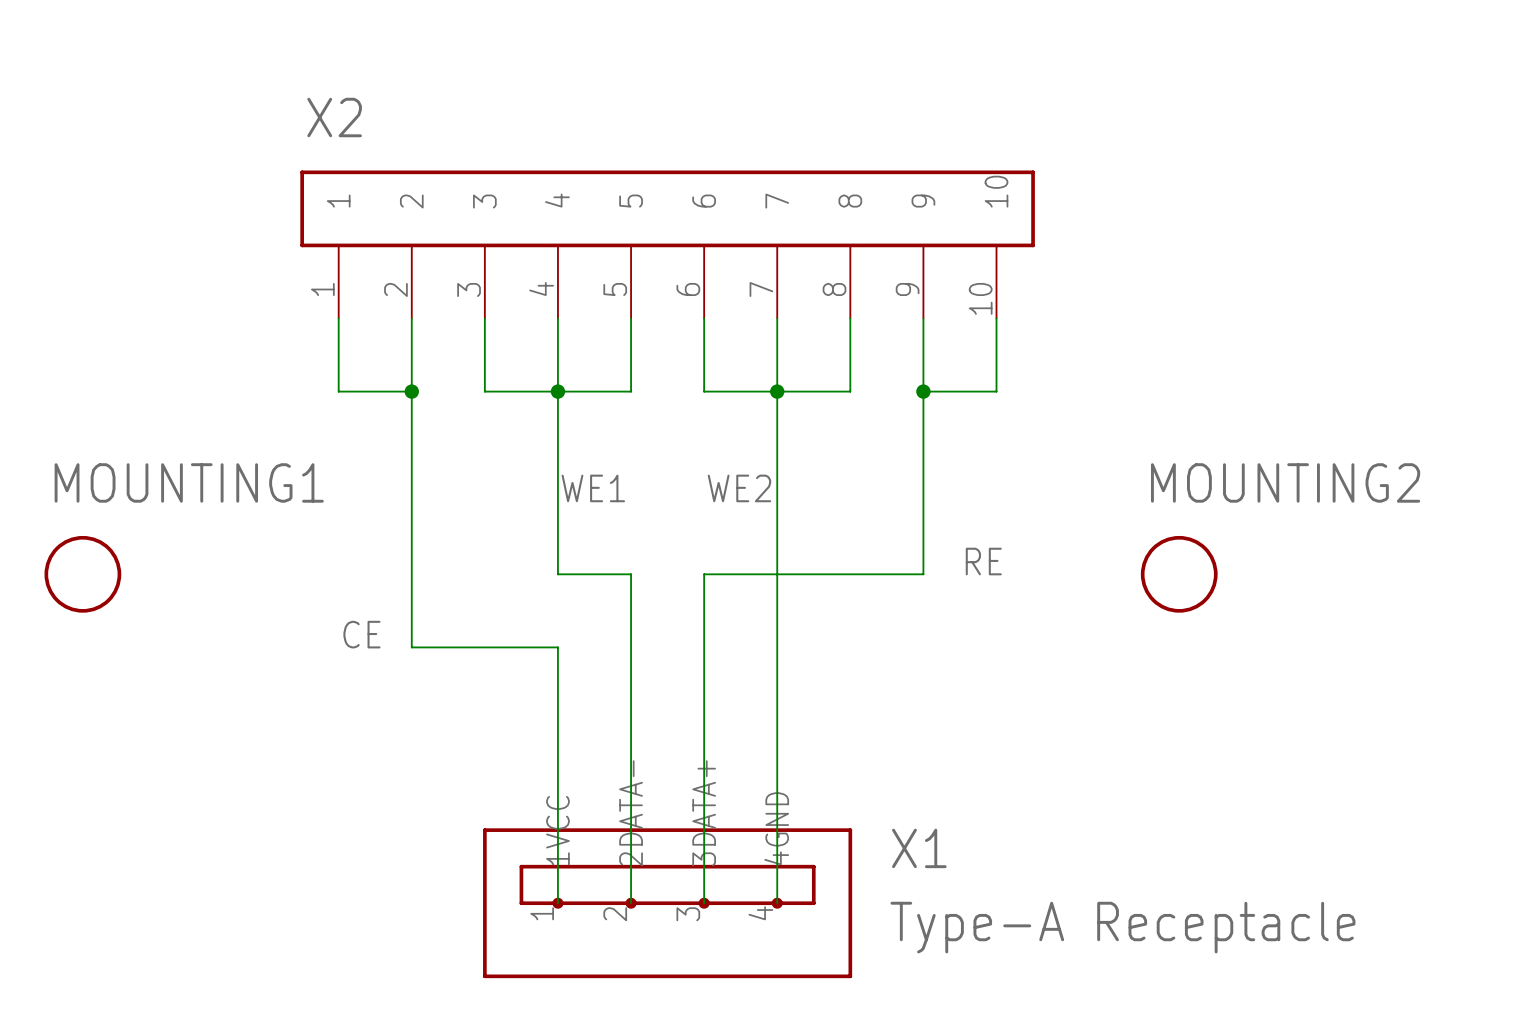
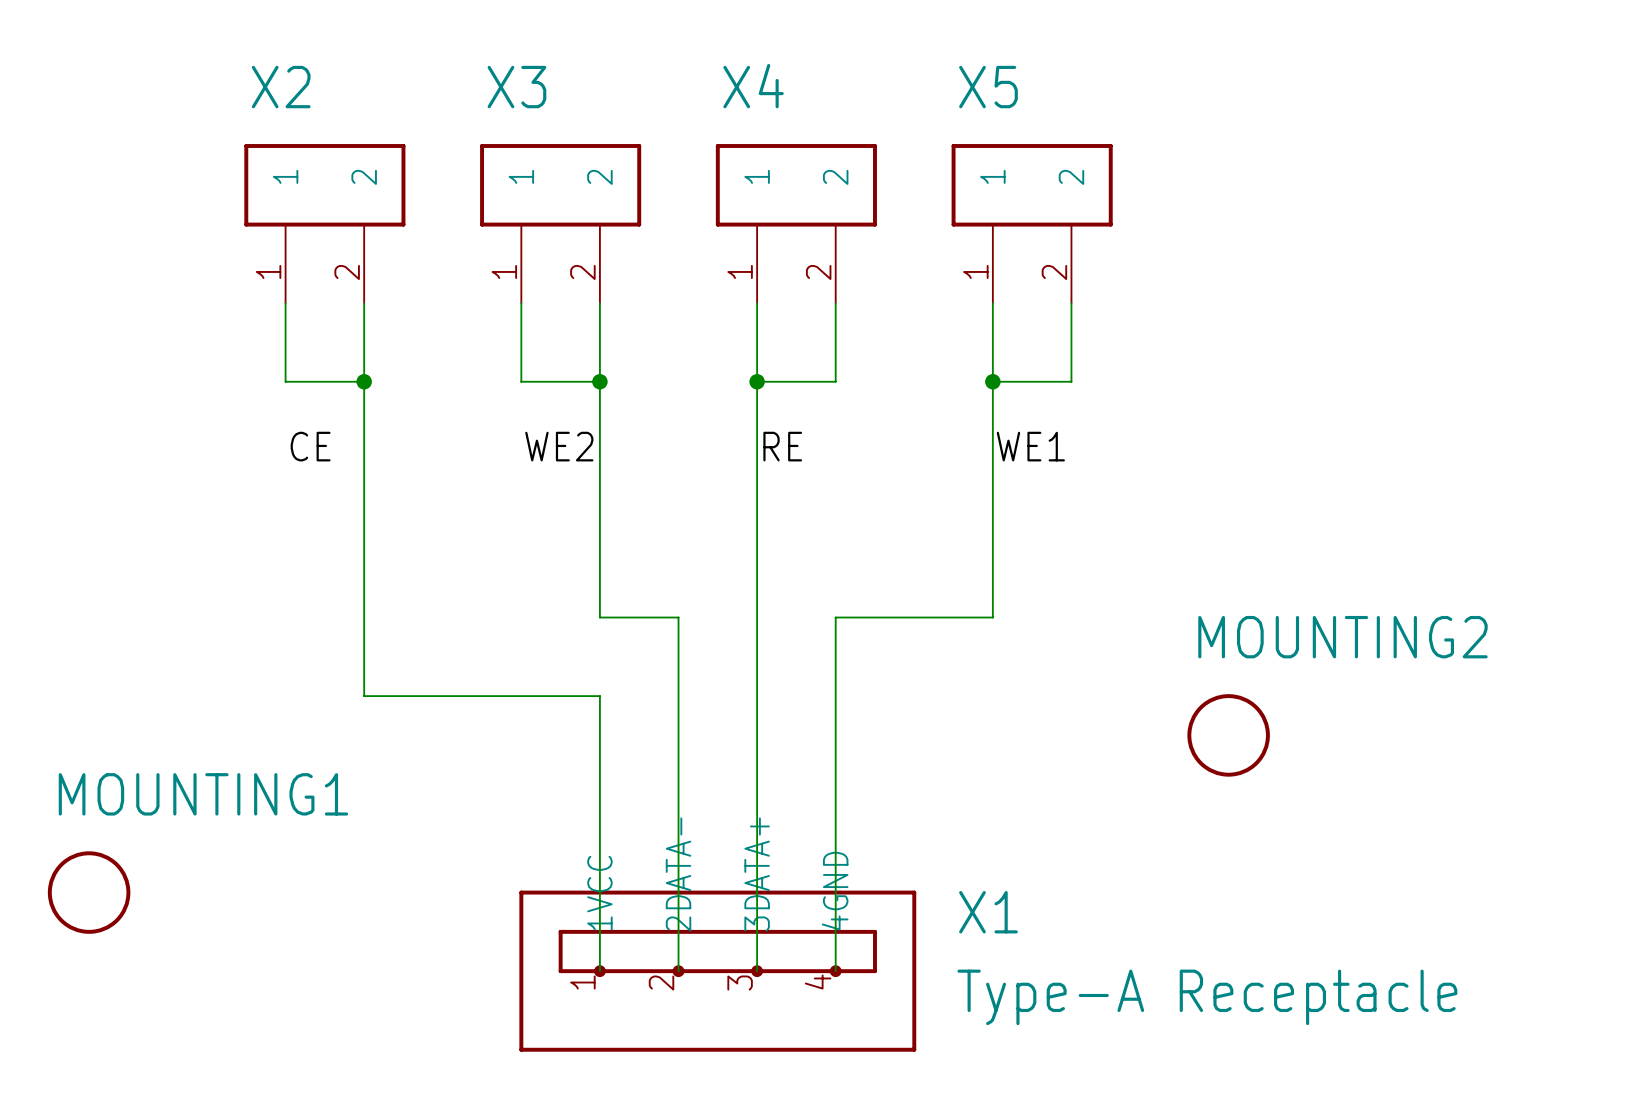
X2 name position: X2 (334, 117) -> X2 (281, 87)
X2 symbol: [300, 170, 1035, 319] -> [244, 144, 406, 304]
X3: none -> (560, 223)
X4: none -> (796, 223)
X5: none -> (1032, 223)
wire: none -> (285, 303) (285, 381) (364, 381)
wire: (411, 318) (411, 647) -> (364, 421) (364, 696) (442, 696)
wire: (631, 318) (631, 391) (484, 391) (484, 355) -> (599, 381) (521, 381)
wire: (850, 318) (850, 391) (704, 391) -> none
junction: none -> (364, 381)
wire: none -> (757, 381) (835, 381)
junction: none -> (757, 381)
wire: (777, 355) (777, 574) (704, 574) -> (757, 421) (757, 617)
wire: (996, 355) (996, 391) (923, 391) -> (1071, 381) (992, 381)
wire: (338, 391) (411, 391) -> none
junction: (411, 391) -> none
junction position: (557, 391) -> (599, 381)
junction: (777, 391) -> none
junction position: (923, 391) -> (992, 381)
label: none -> WE1 (1030, 446)
label: WE1 (593, 488) -> none
label position: WE2 (739, 488) -> WE2 (559, 446)
label position: RE (983, 561) -> RE (782, 446)
MOUNTING1 position: (82, 574) -> (89, 892)
MOUNTING2 position: (1179, 574) -> (1228, 735)
label position: CE (361, 634) -> CE (310, 446)

